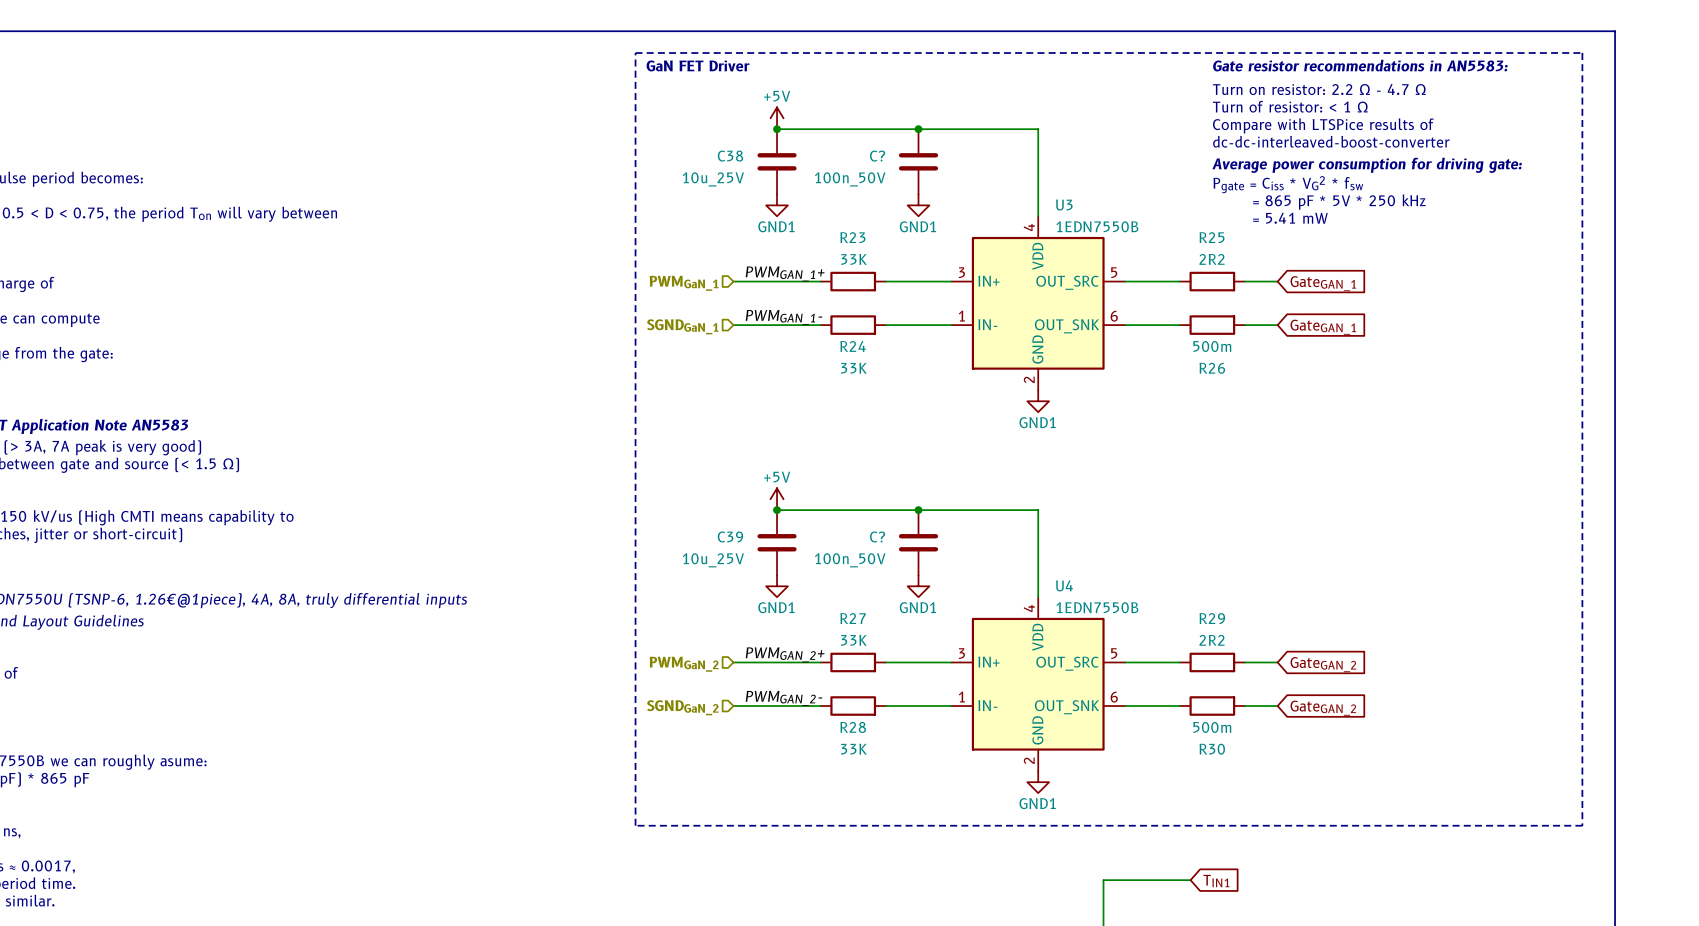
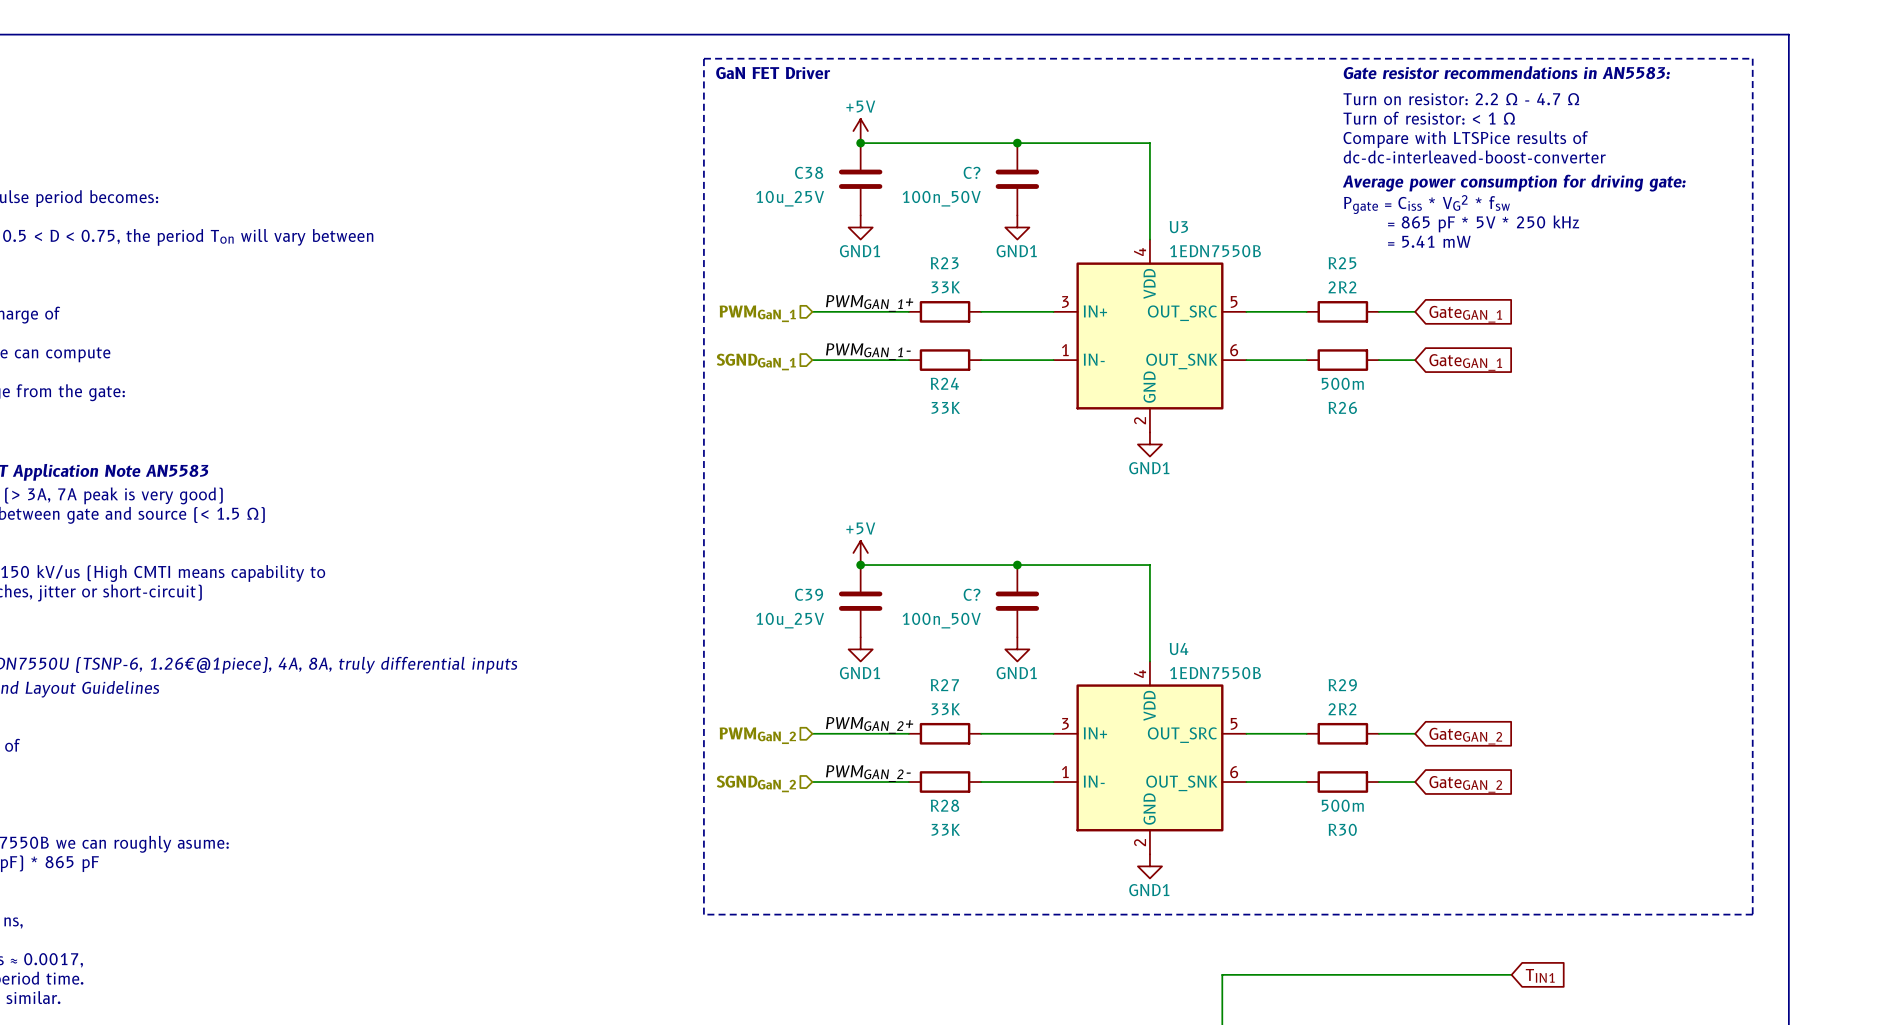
wire: none -> (1318, 974) (1511, 974)
global label position: TIN1 (1216, 881) -> TIN1 (1540, 975)

